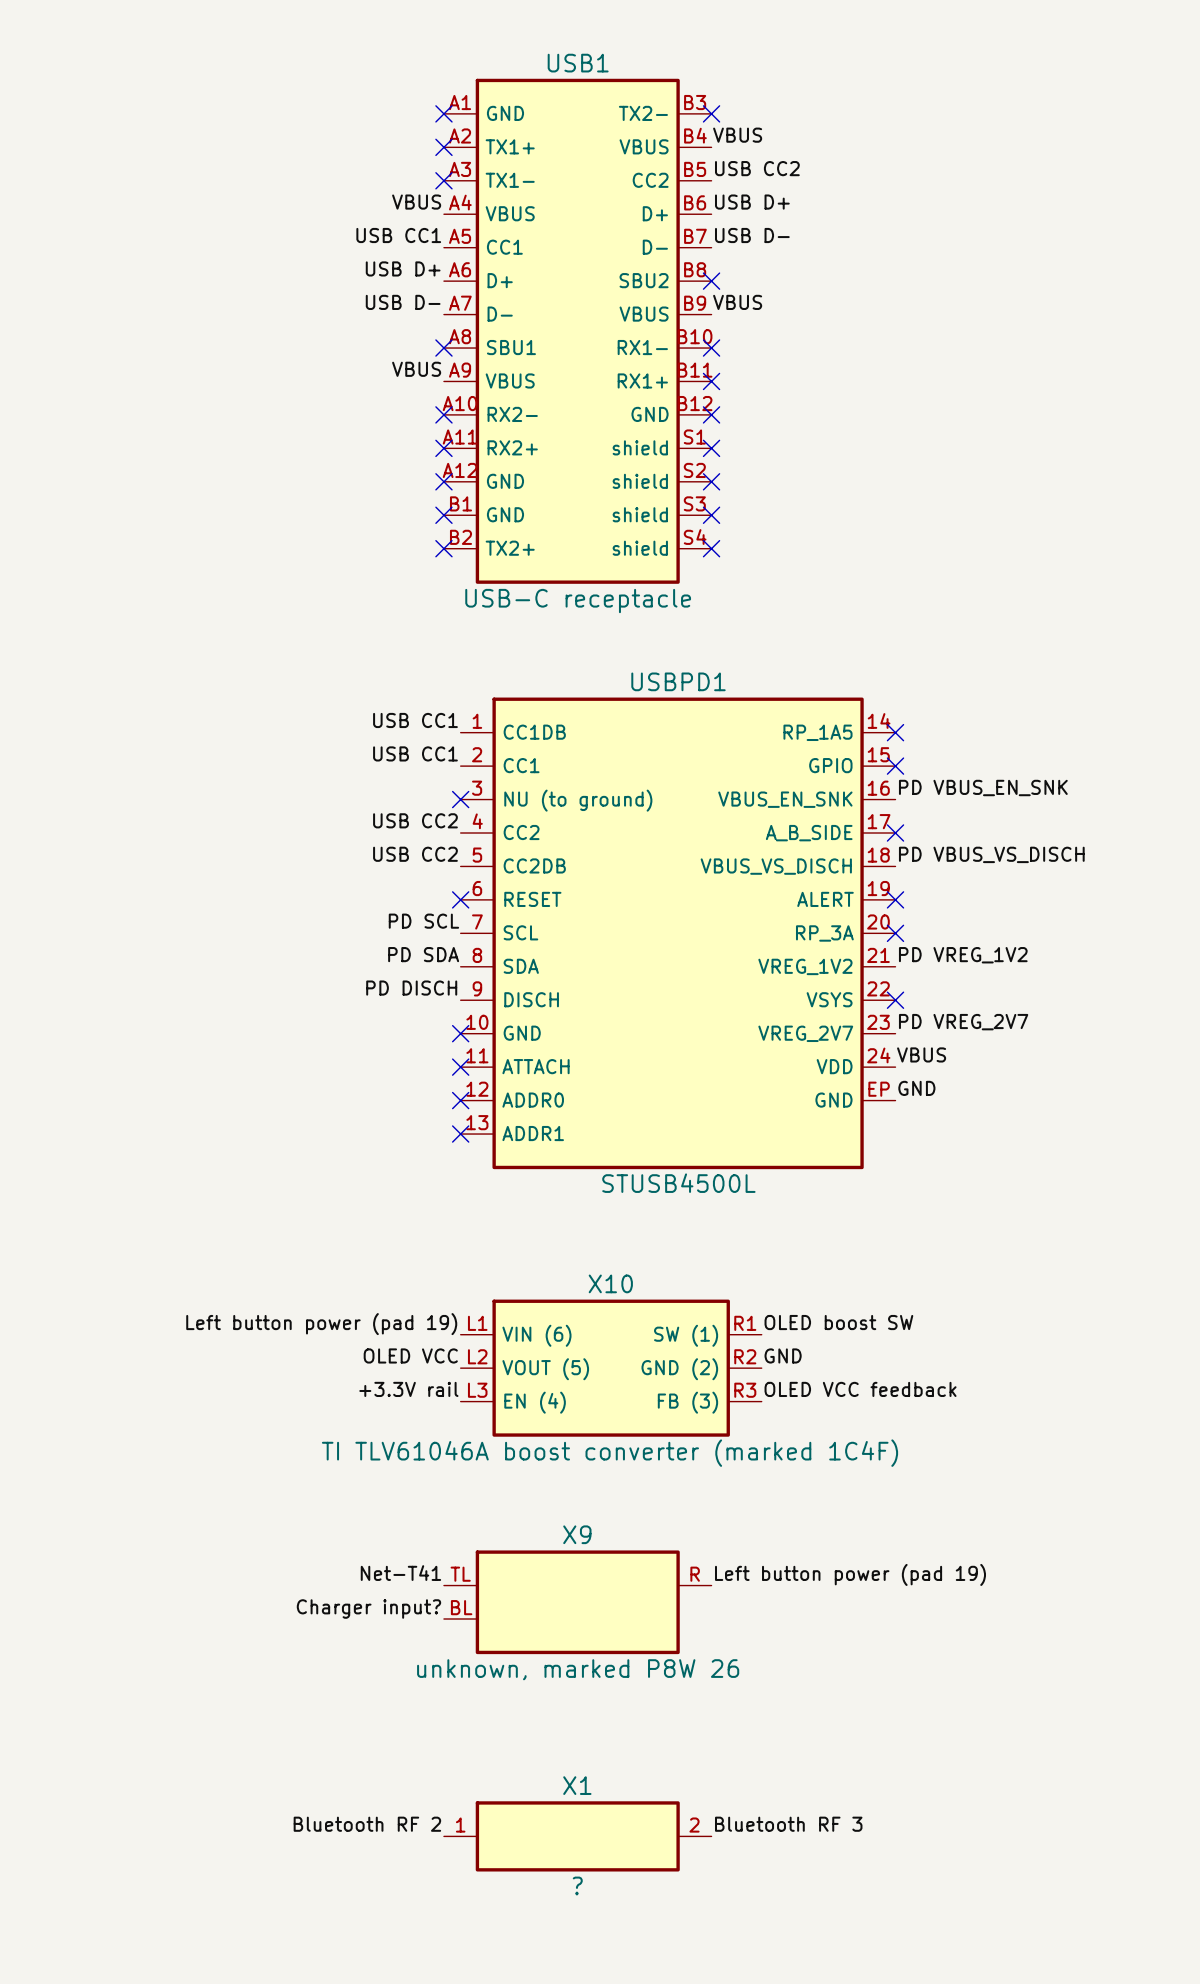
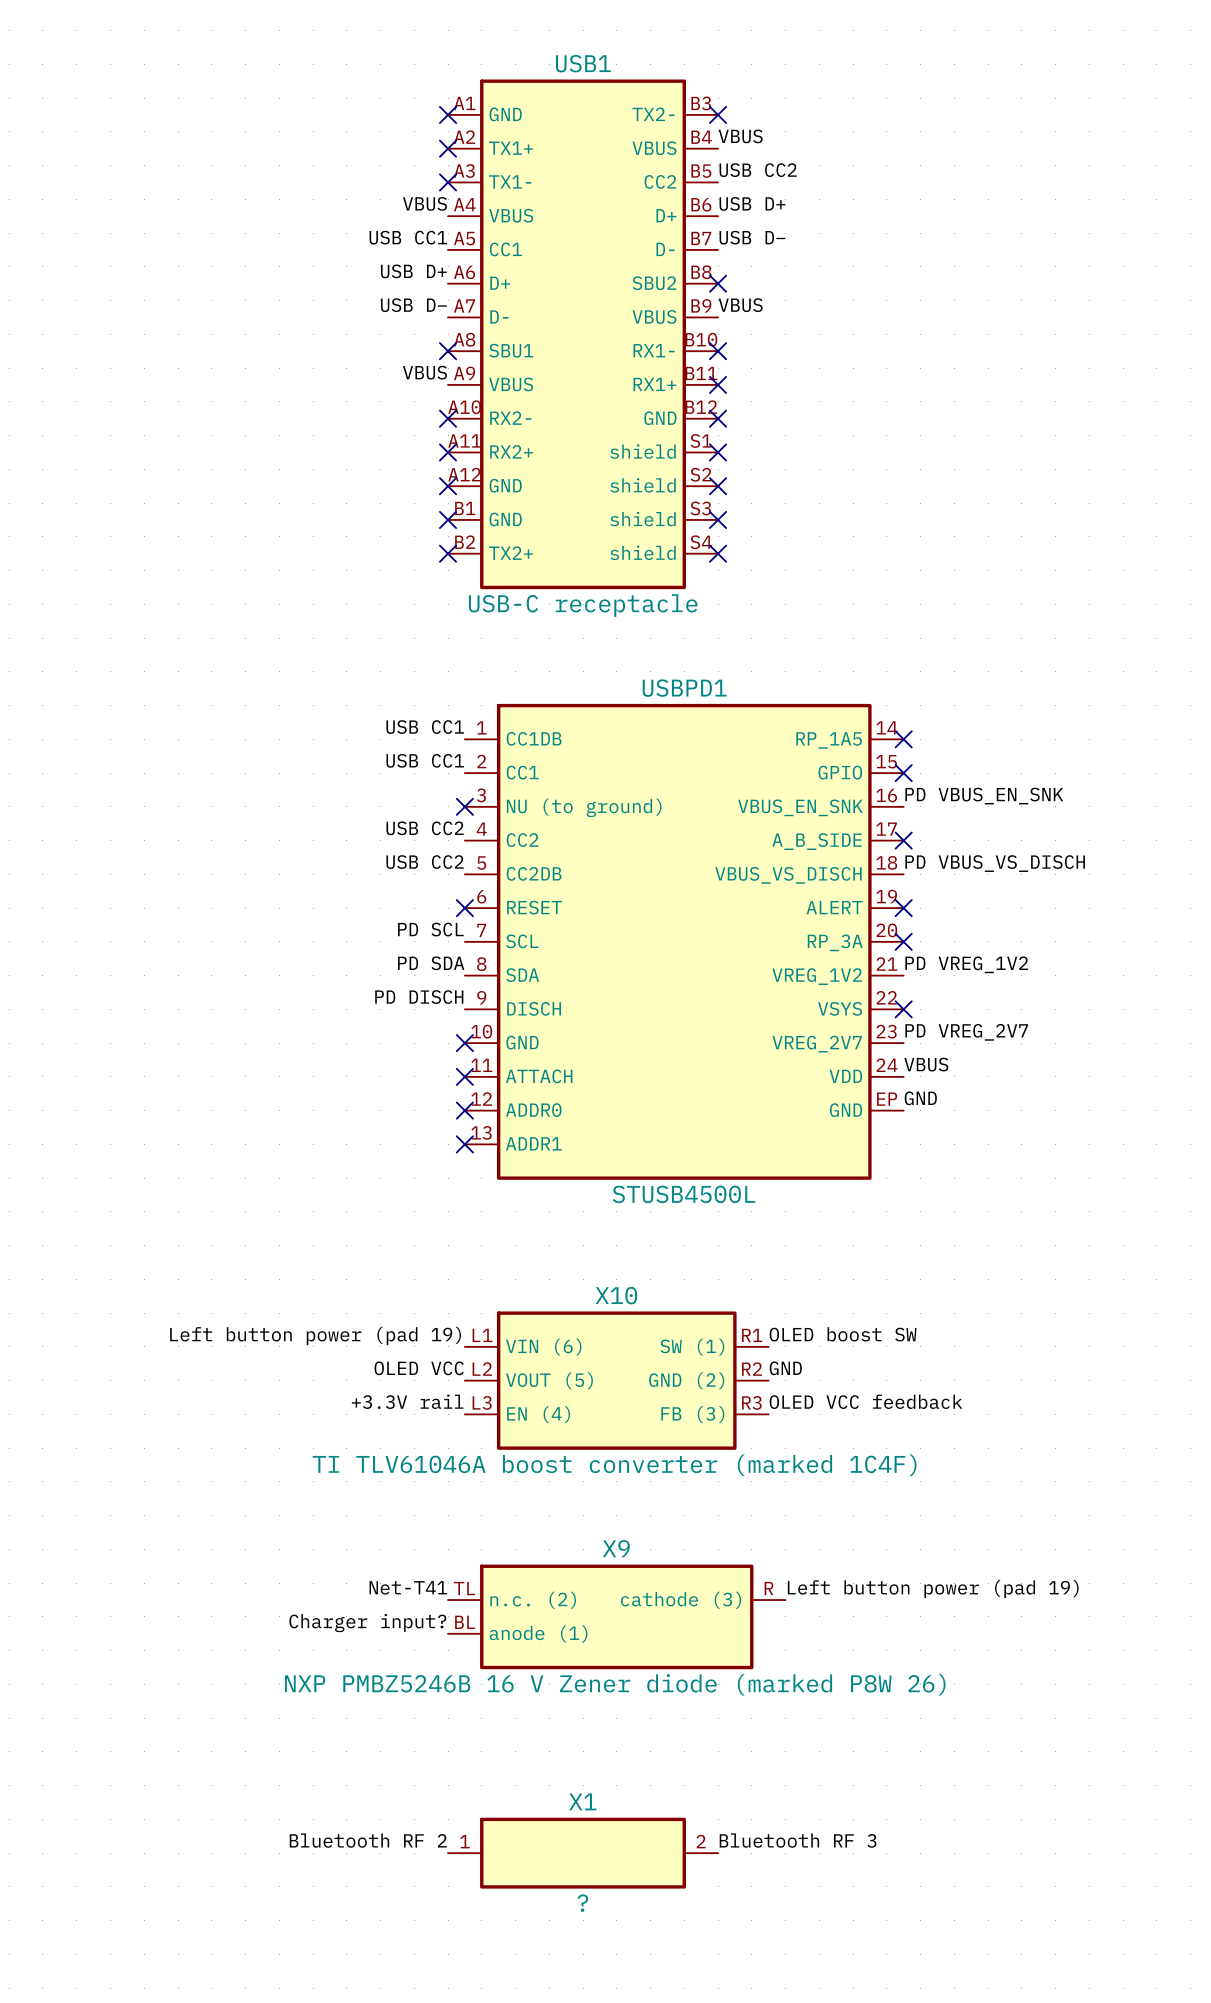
X9 symbol: [443, 1550, 712, 1655] -> [448, 1564, 786, 1670]
label position: Left button power (pad 19) (850, 1574) -> Left button power (pad 19) (933, 1589)
X9 value: unknown, marked P8W 26 (578, 1669) -> NXP PMBZ5246B 16 V Zener diode (marked P8W 26) (615, 1684)

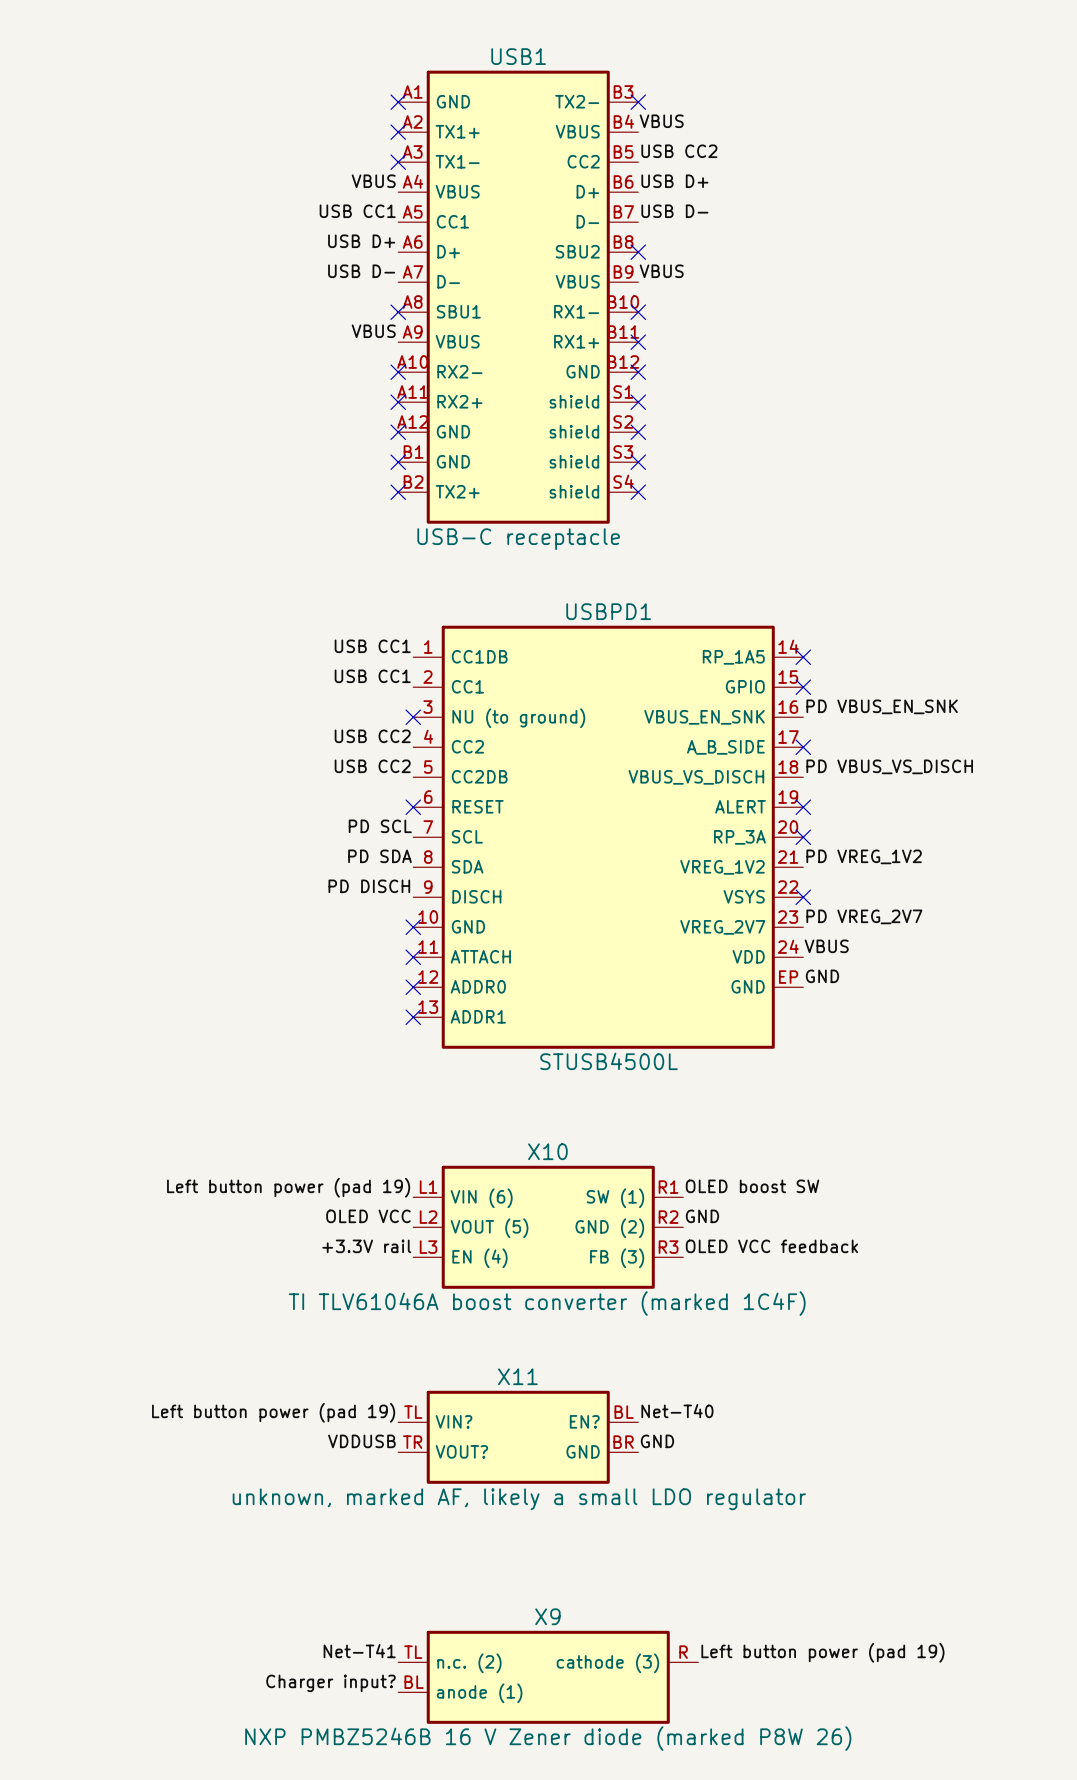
label: Net-T41 (408, 1587) -> Left button power (pad 19) (273, 1412)
label: none -> Net-T40 (677, 1411)
label position: Left button power (pad 19) (933, 1589) -> Left button power (pad 19) (822, 1652)
X11: none -> unknown, marked AF, likely a small LDO regulator (518, 1437)
X9 position: (616, 1616) -> (548, 1677)
label: none -> GND (657, 1441)
label: Charger input? (367, 1623) -> VDDUSB (361, 1441)
label: Bluetooth RF 2 (368, 1840) -> none
label: Bluetooth RF 3 (798, 1840) -> none
X1: ? (583, 1853) -> none
label: none -> Net-T41 (359, 1651)
label: none -> Charger input? (330, 1683)

